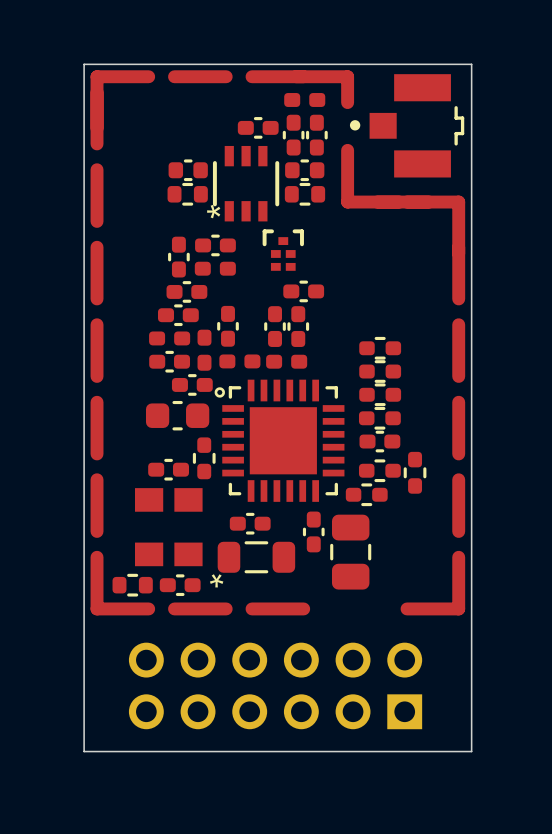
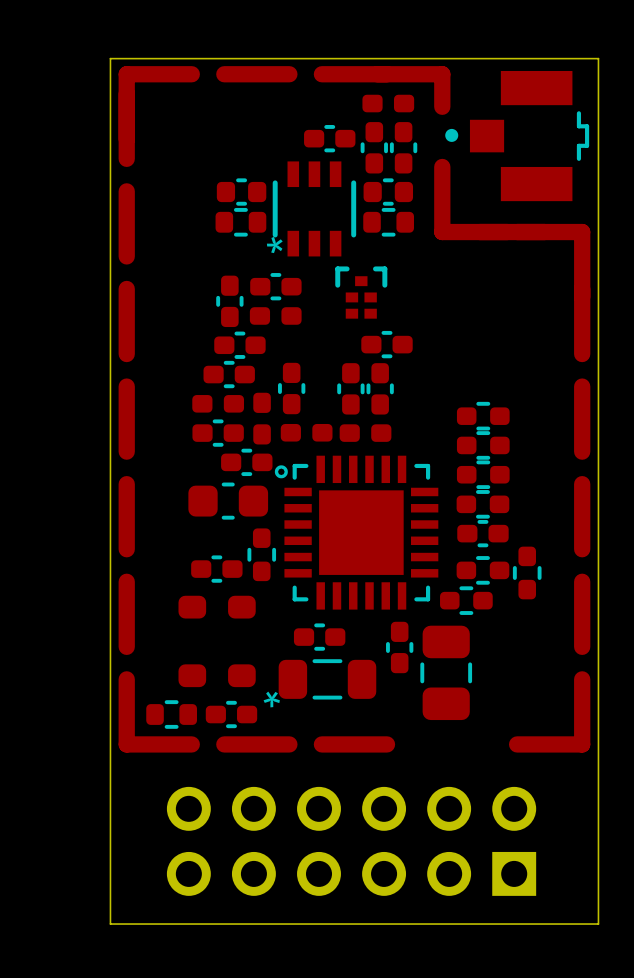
part footprint: [134, 488, 203, 567] -> [178, 595, 256, 688]

